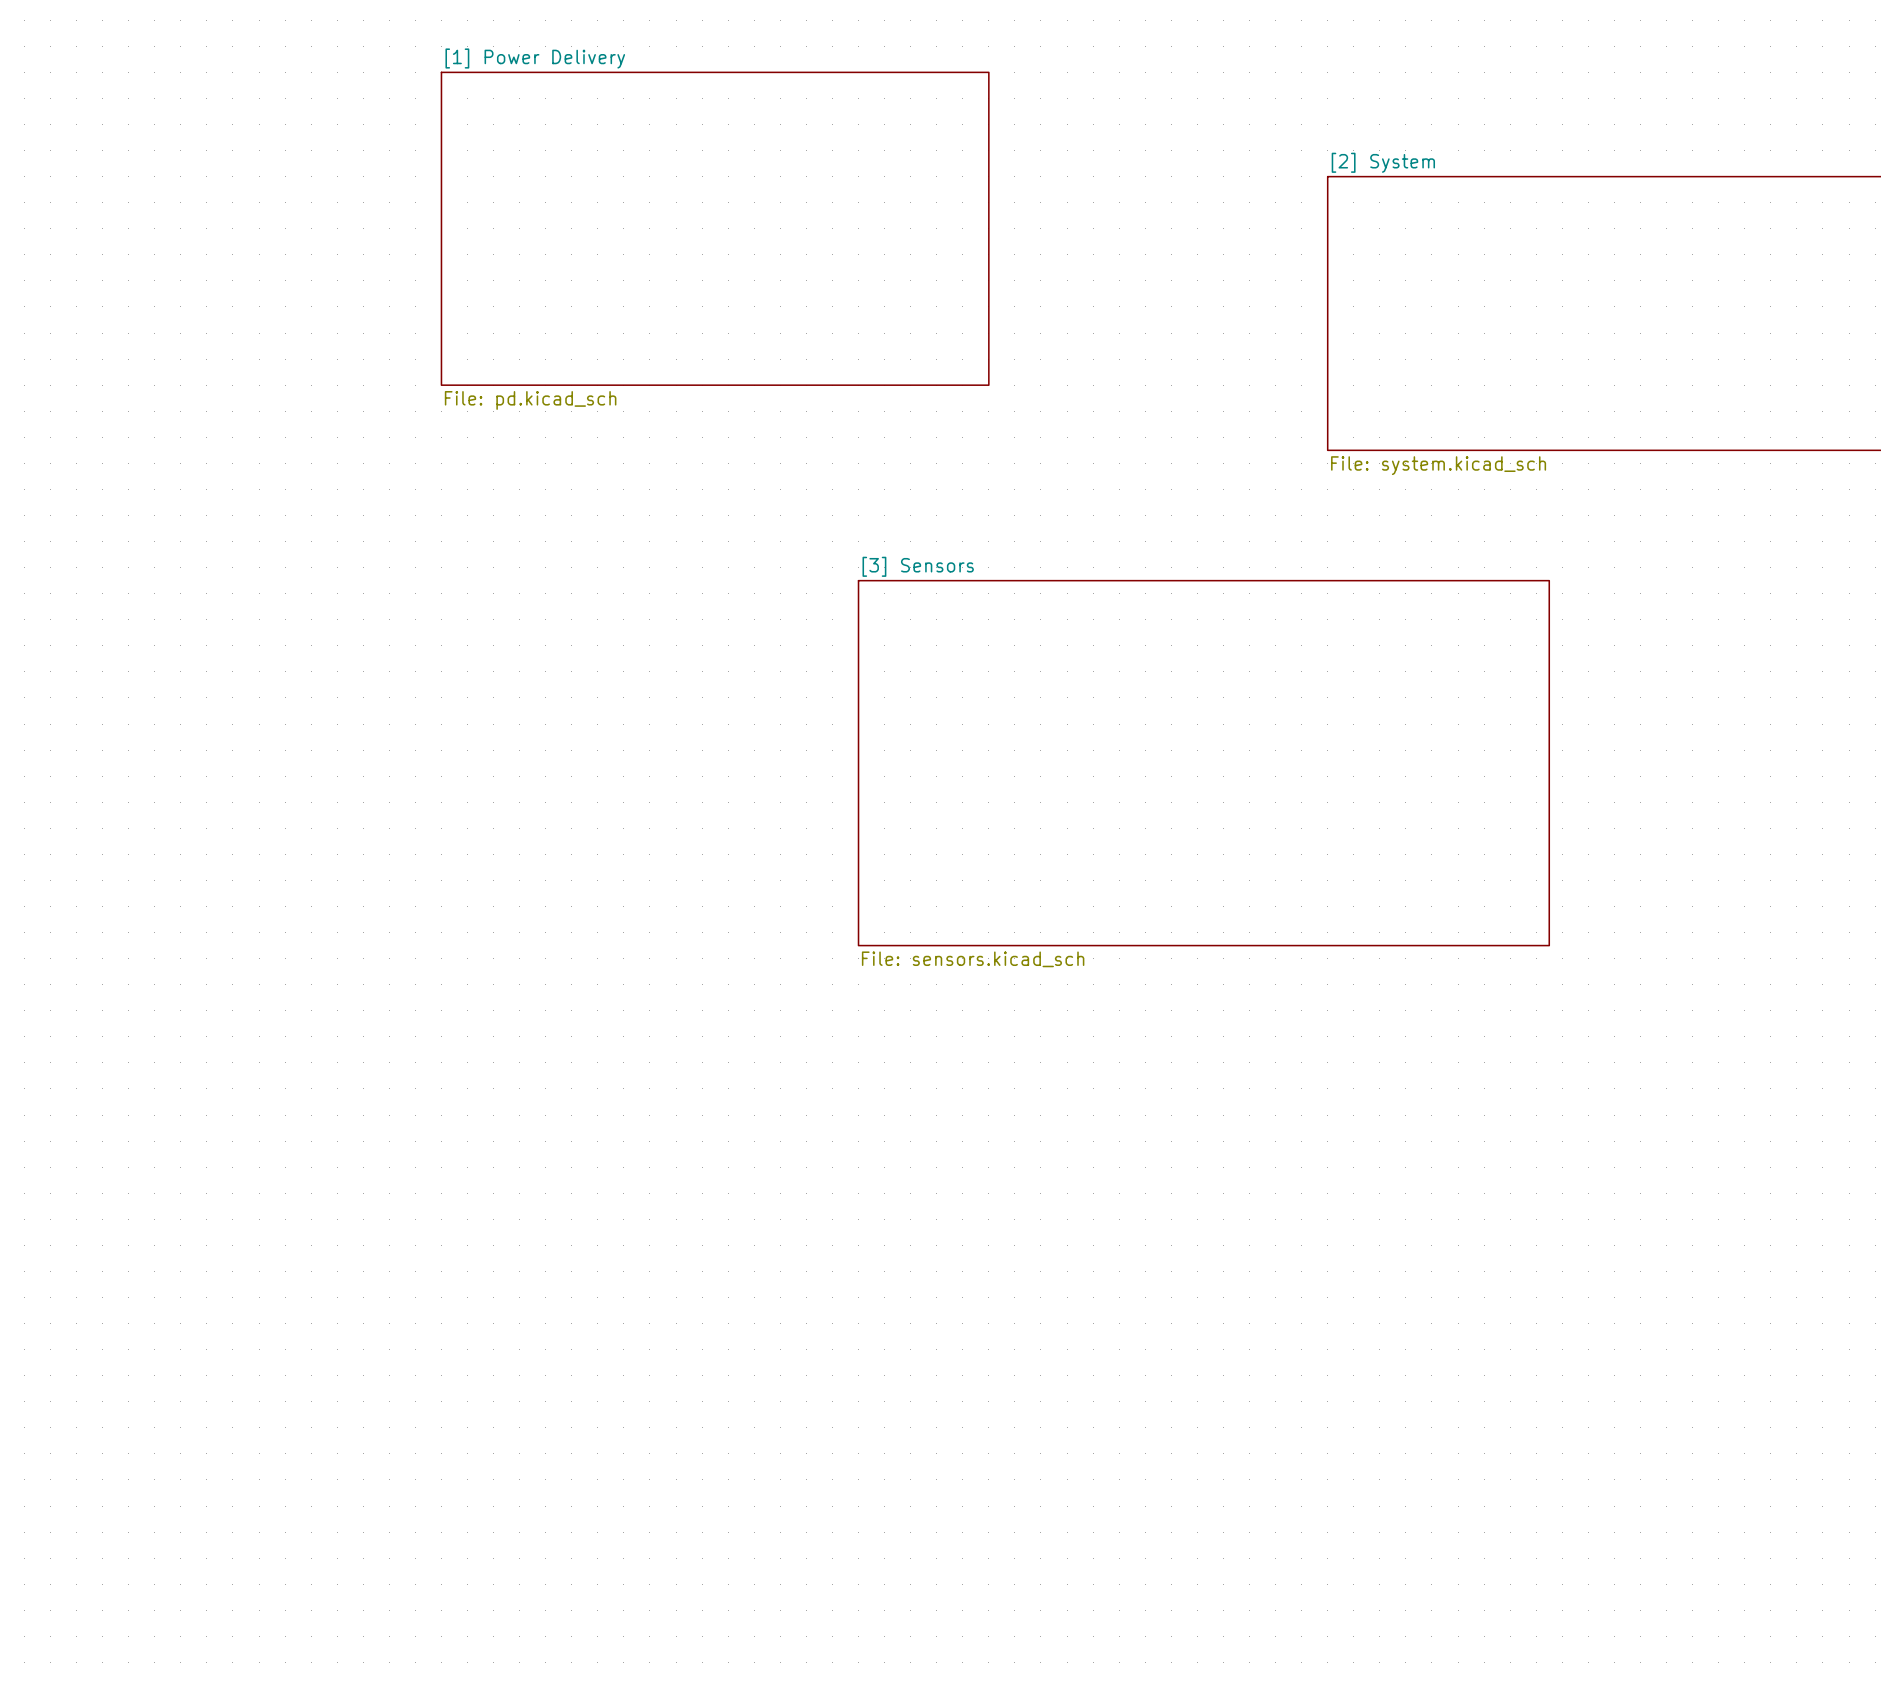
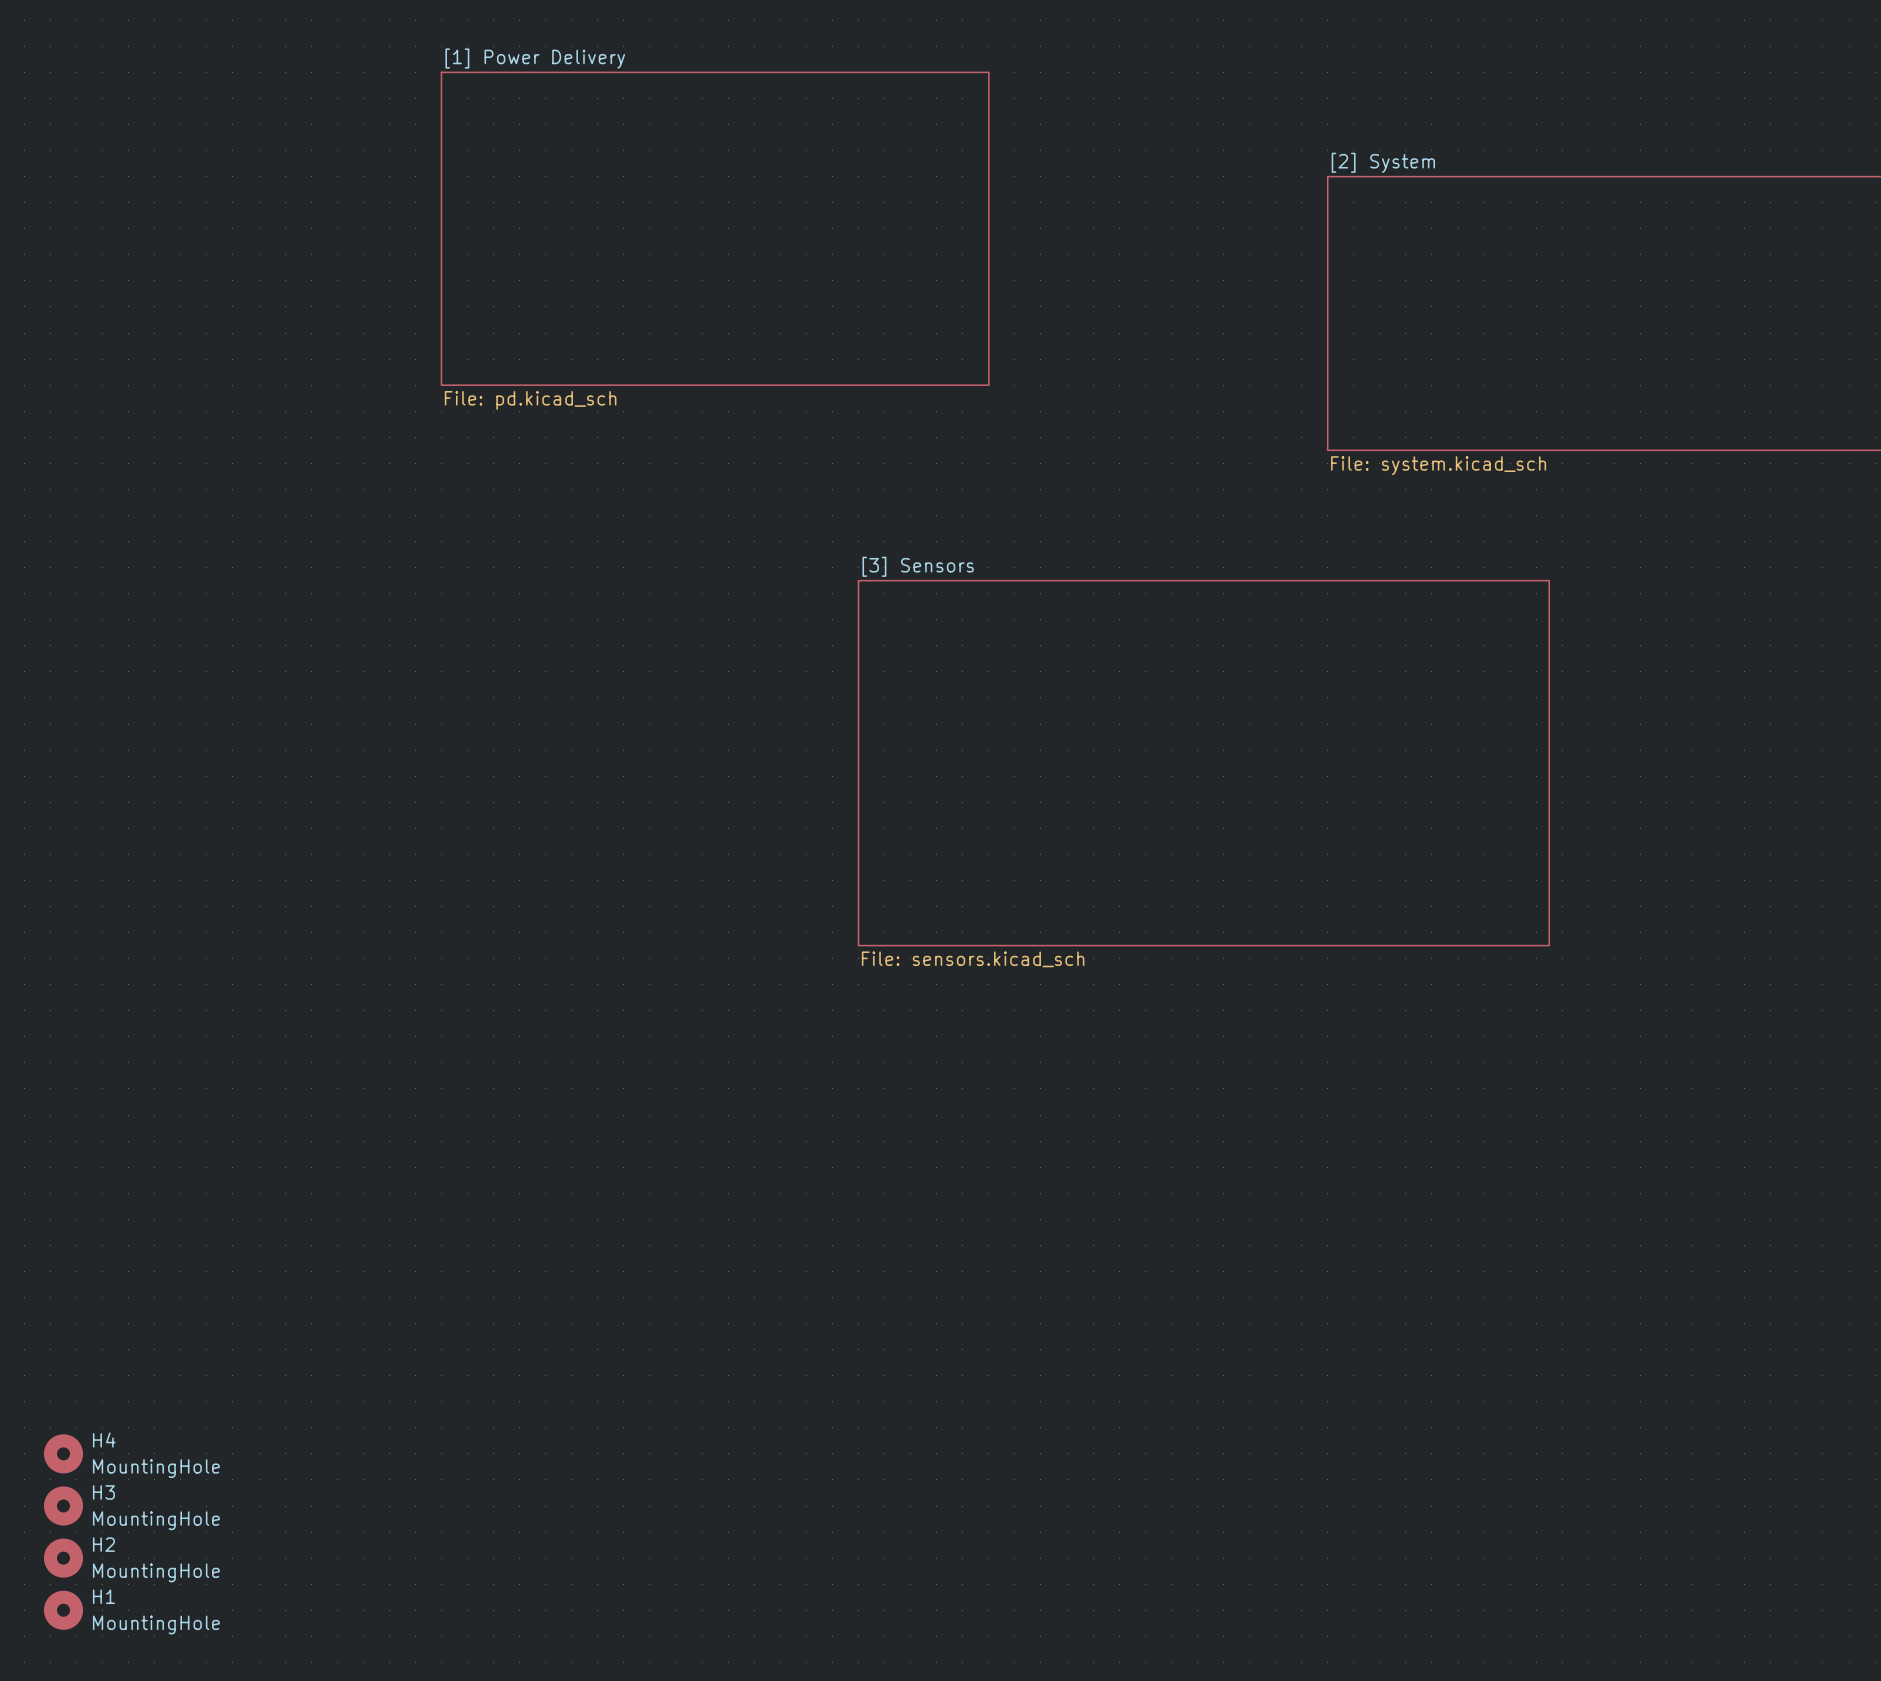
H4: none -> MountingHole (63, 1453)
H3: none -> MountingHole (63, 1506)
H2: none -> MountingHole (63, 1558)
H1: none -> MountingHole (63, 1610)

